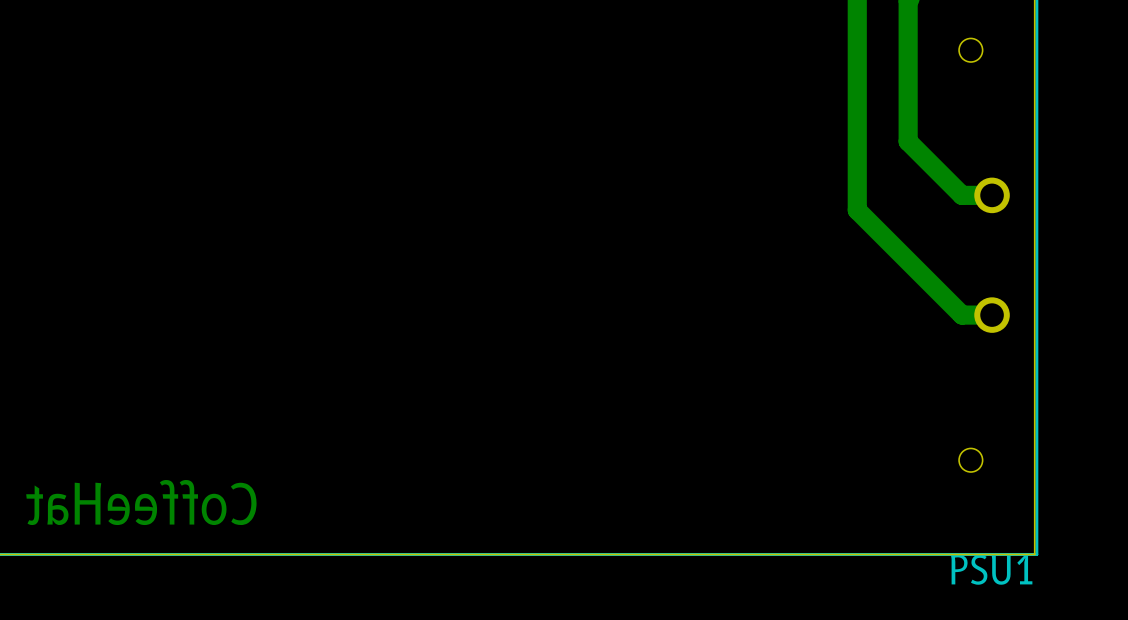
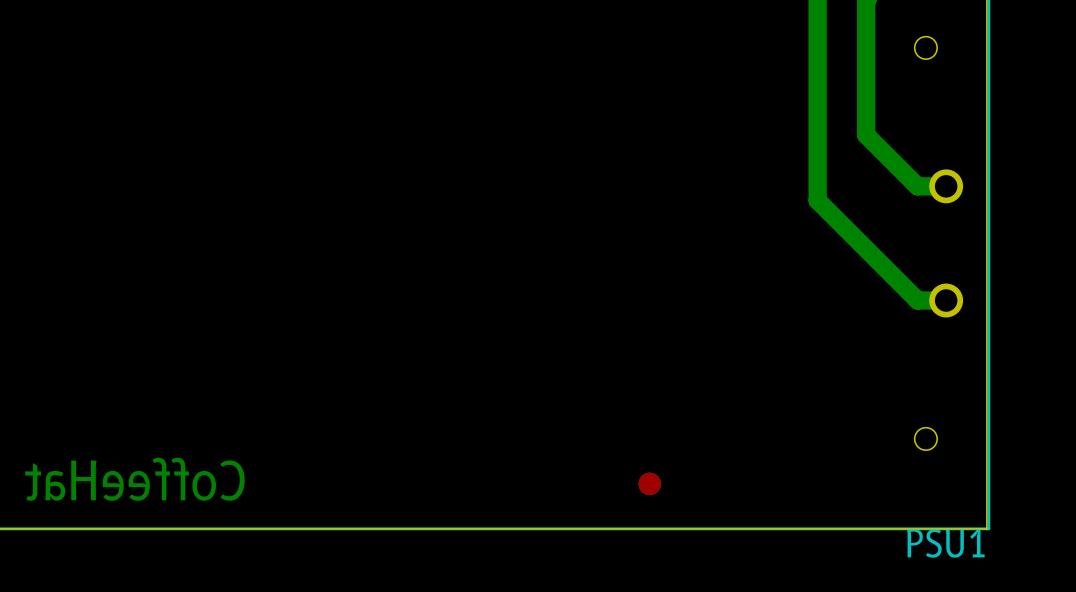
part: none -> (649, 483)

